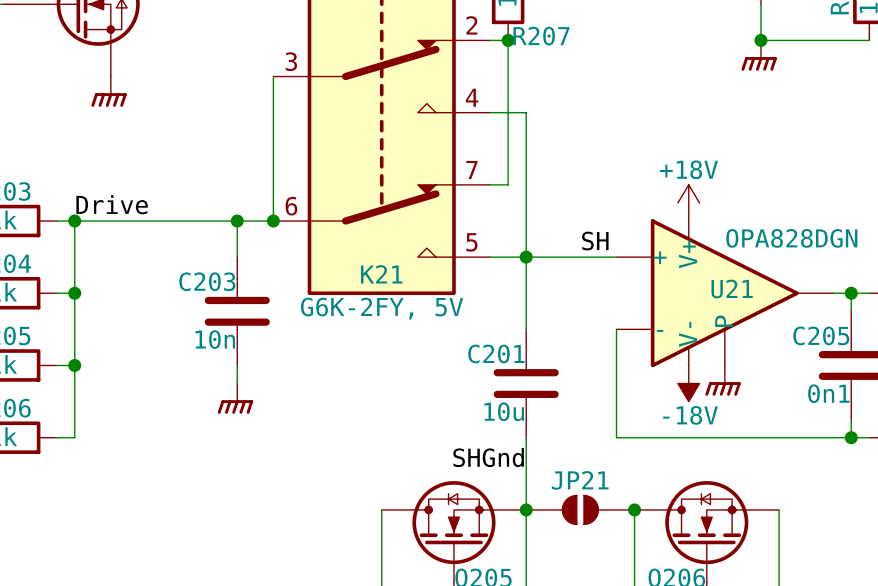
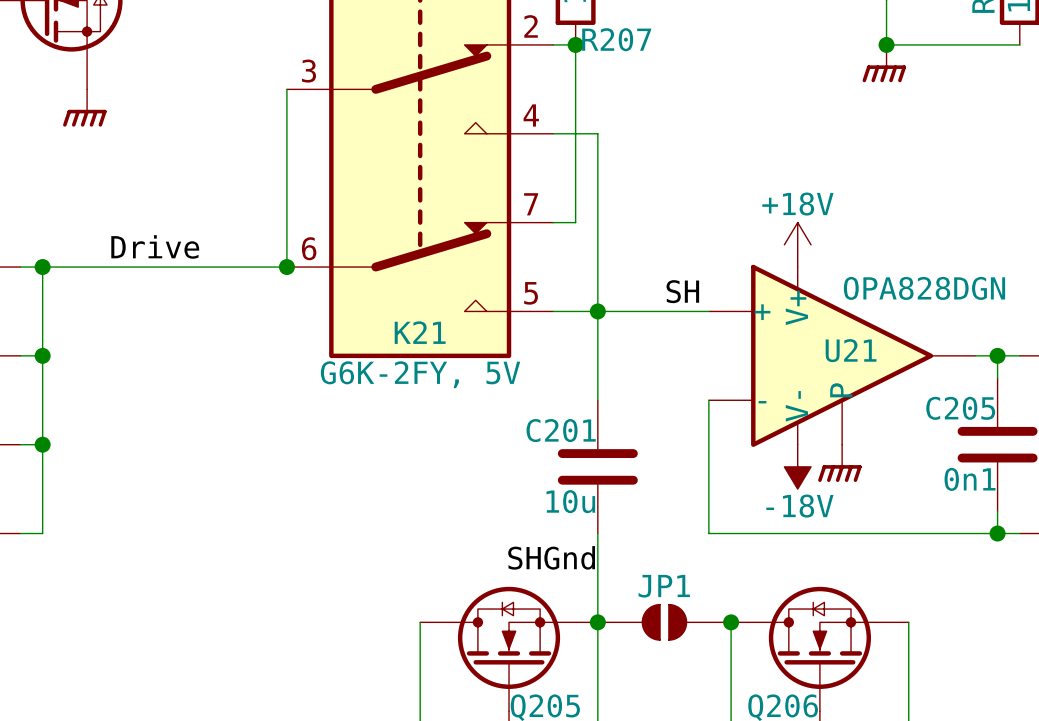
label position: Drive (112, 204) -> Drive (155, 246)
wire: (237, 221) (237, 257) -> none
junction: (237, 221) -> none
C203: 10n (237, 311) -> none
wire: (237, 365) (237, 383) -> none
power symbol: (235, 398) -> none
JP21 name: JP21 (580, 480) -> JP1 (664, 586)

